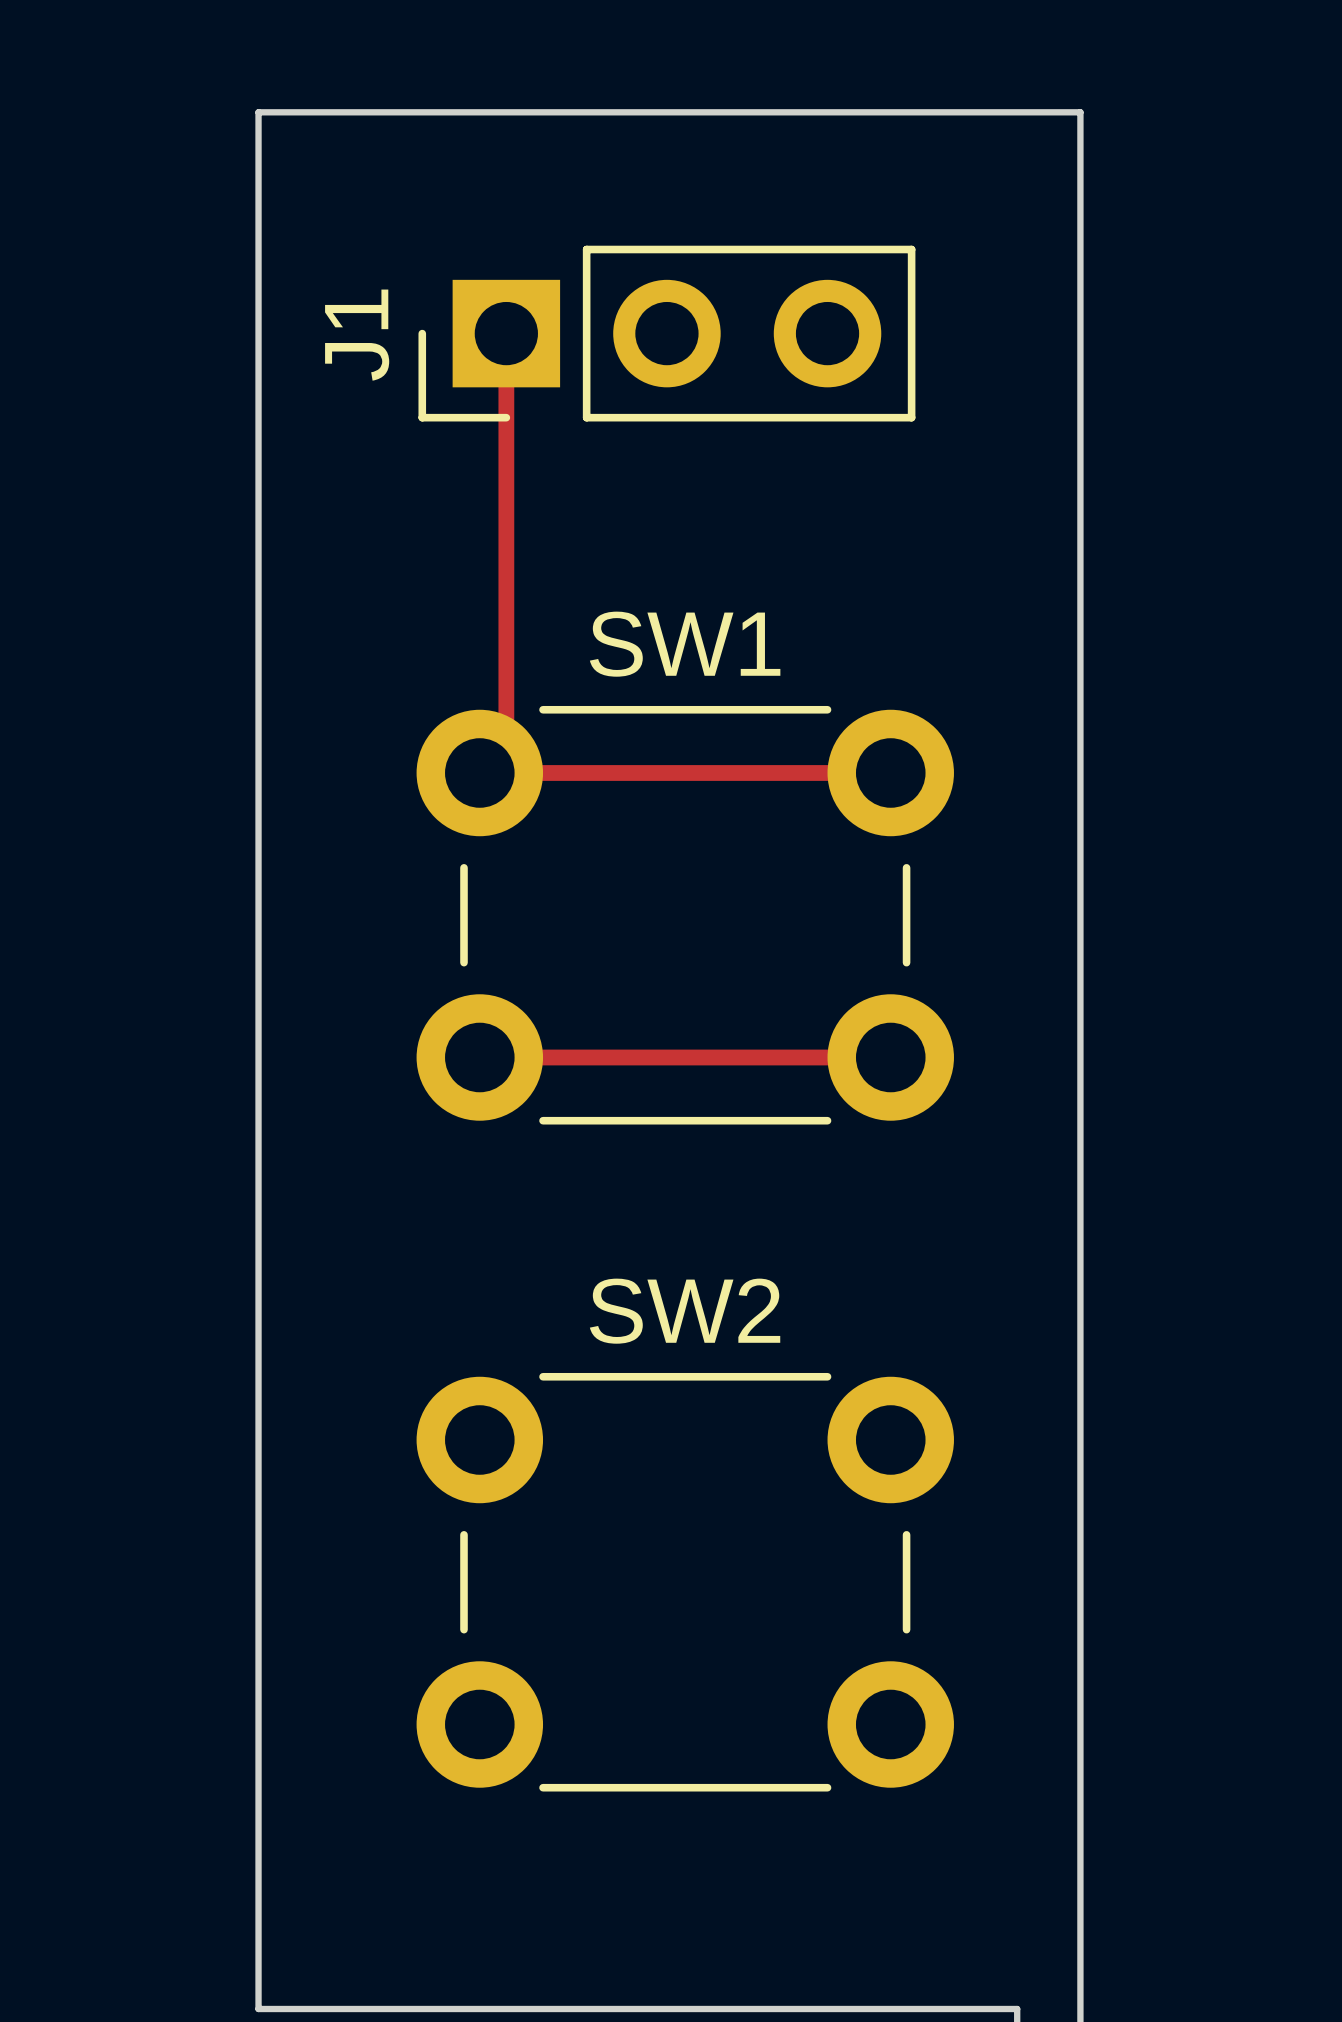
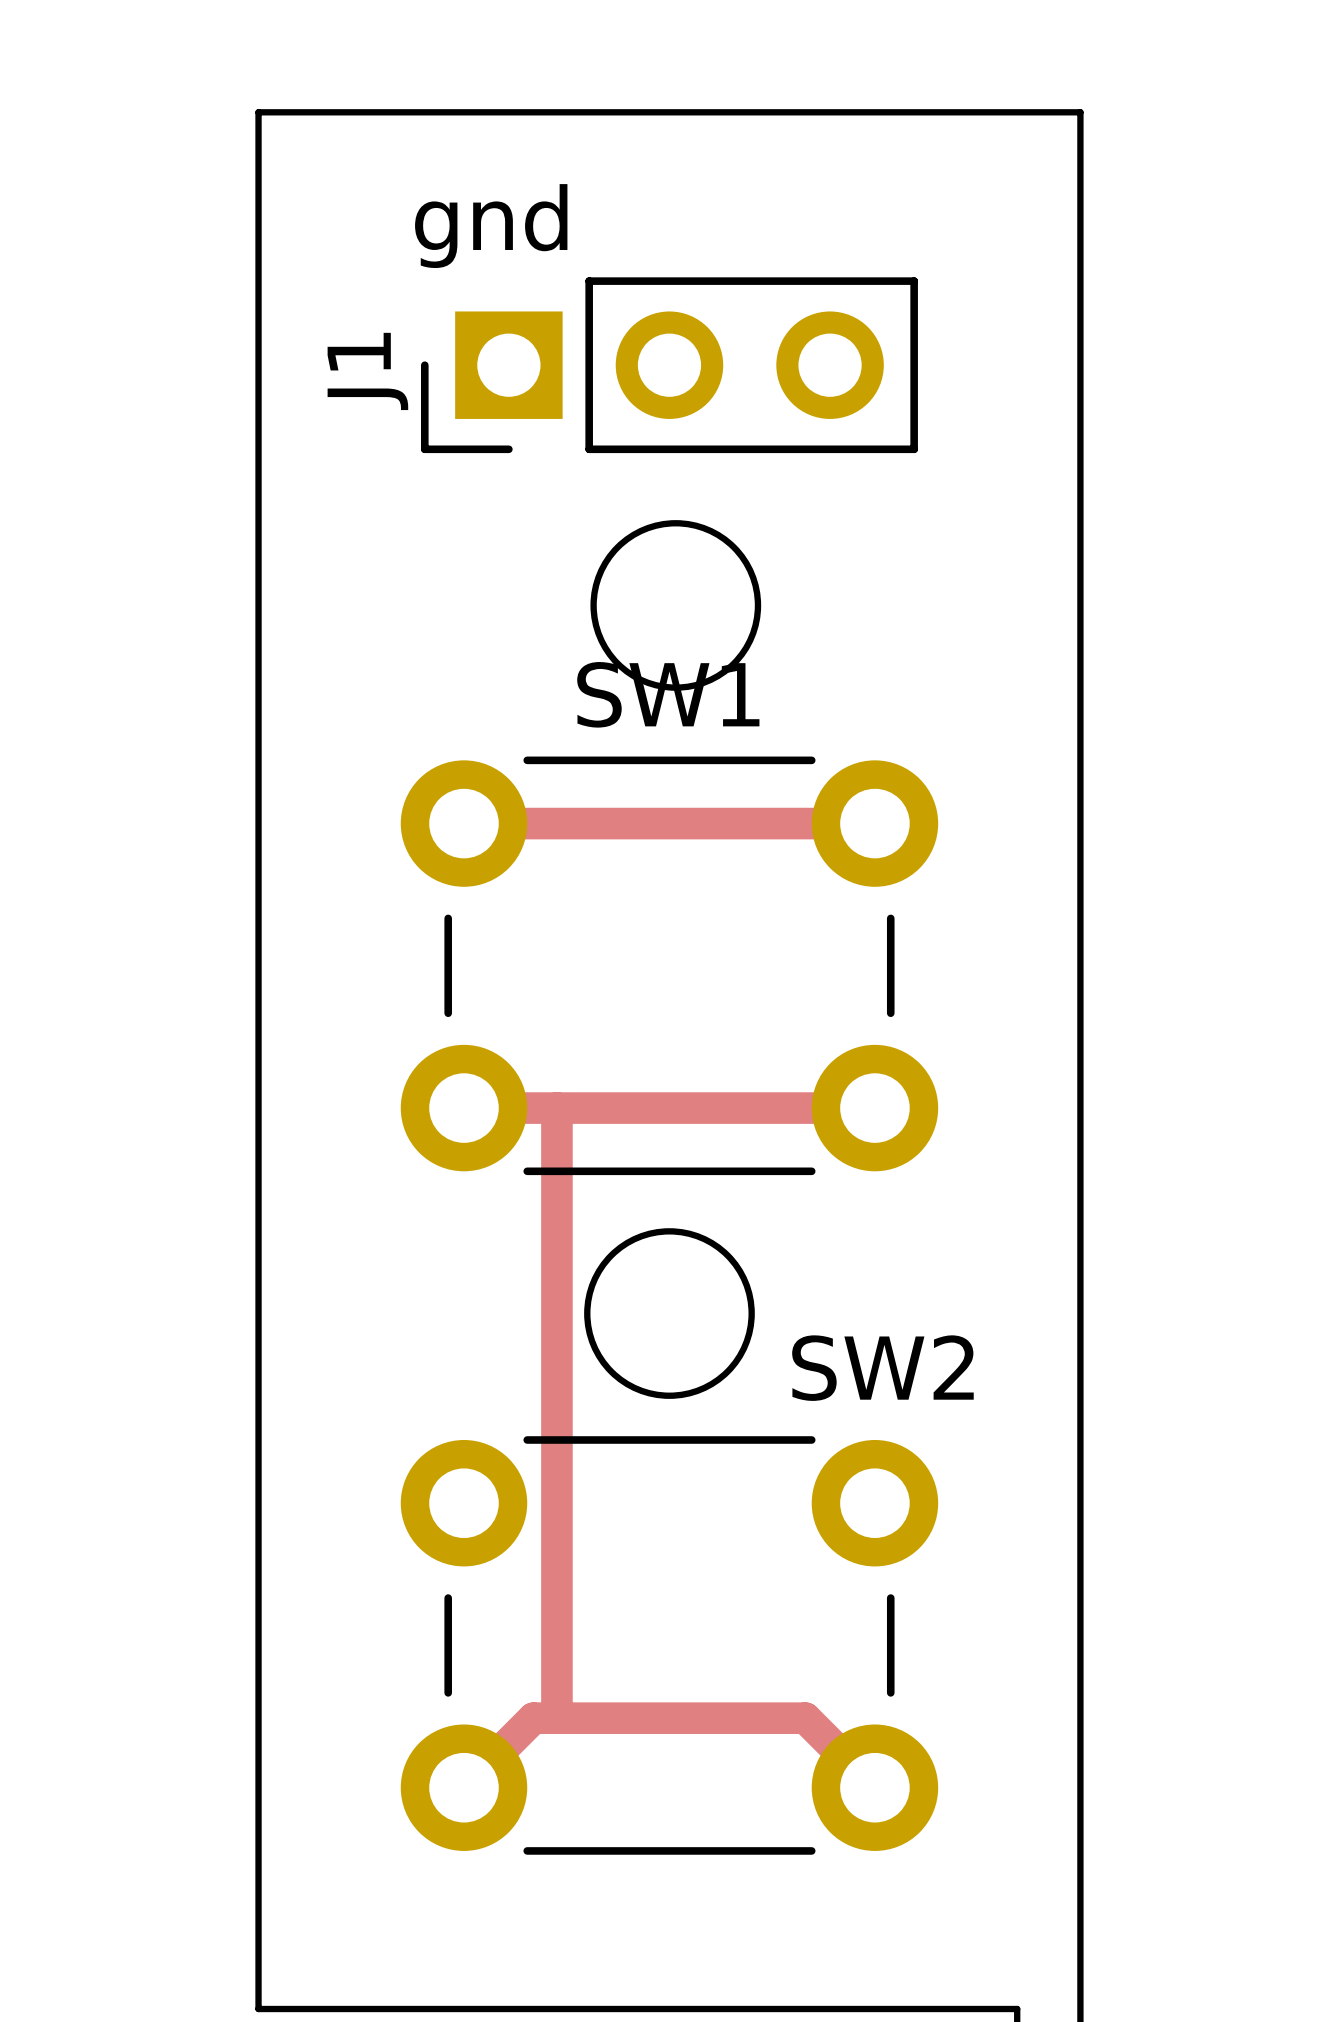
text: none -> gnd (491, 226)
track: (506, 333) (506, 746) (479, 772) (890, 772) -> none
J1 position: (666, 333) -> (669, 365)
round board edge: none -> [590, 520, 762, 691]
track: none -> (464, 823) (874, 823)
SW1 position: (685, 915) -> (669, 965)
track: (479, 1057) (890, 1057) -> (464, 1108) (874, 1108)
track: none -> (556, 1108) (556, 1718)
round board edge: none -> [584, 1228, 755, 1399]
SW2 name position: SW2 (685, 1311) -> SW2 (882, 1368)
SW2 position: (685, 1582) -> (669, 1645)
track: none -> (464, 1787) (533, 1718) (805, 1718) (874, 1787)

